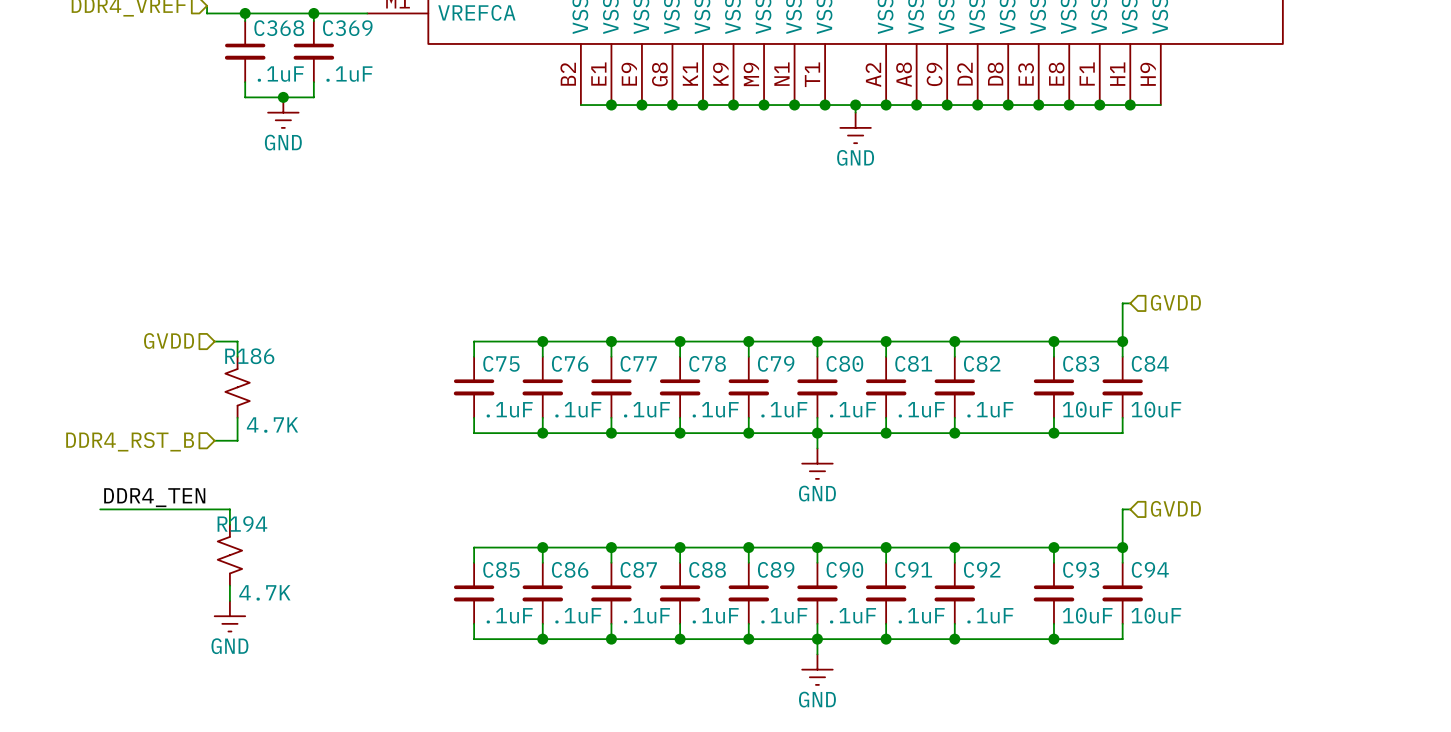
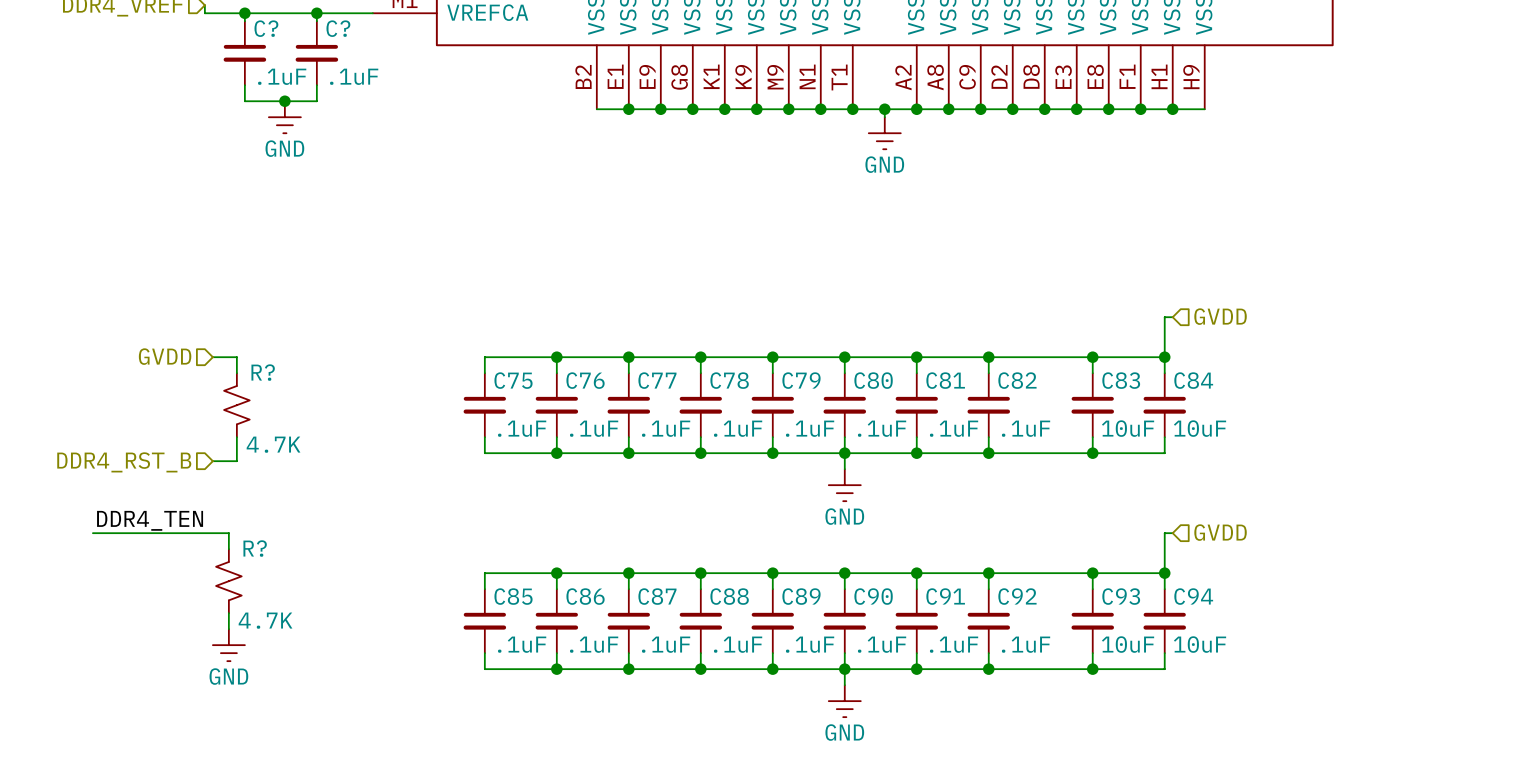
C368 name: C368 (279, 28) -> C? (266, 28)
C369 name: C369 (347, 28) -> C? (338, 28)
R186 name: R186 (249, 356) -> R? (263, 372)
R194 name: R194 (242, 523) -> R? (255, 548)

